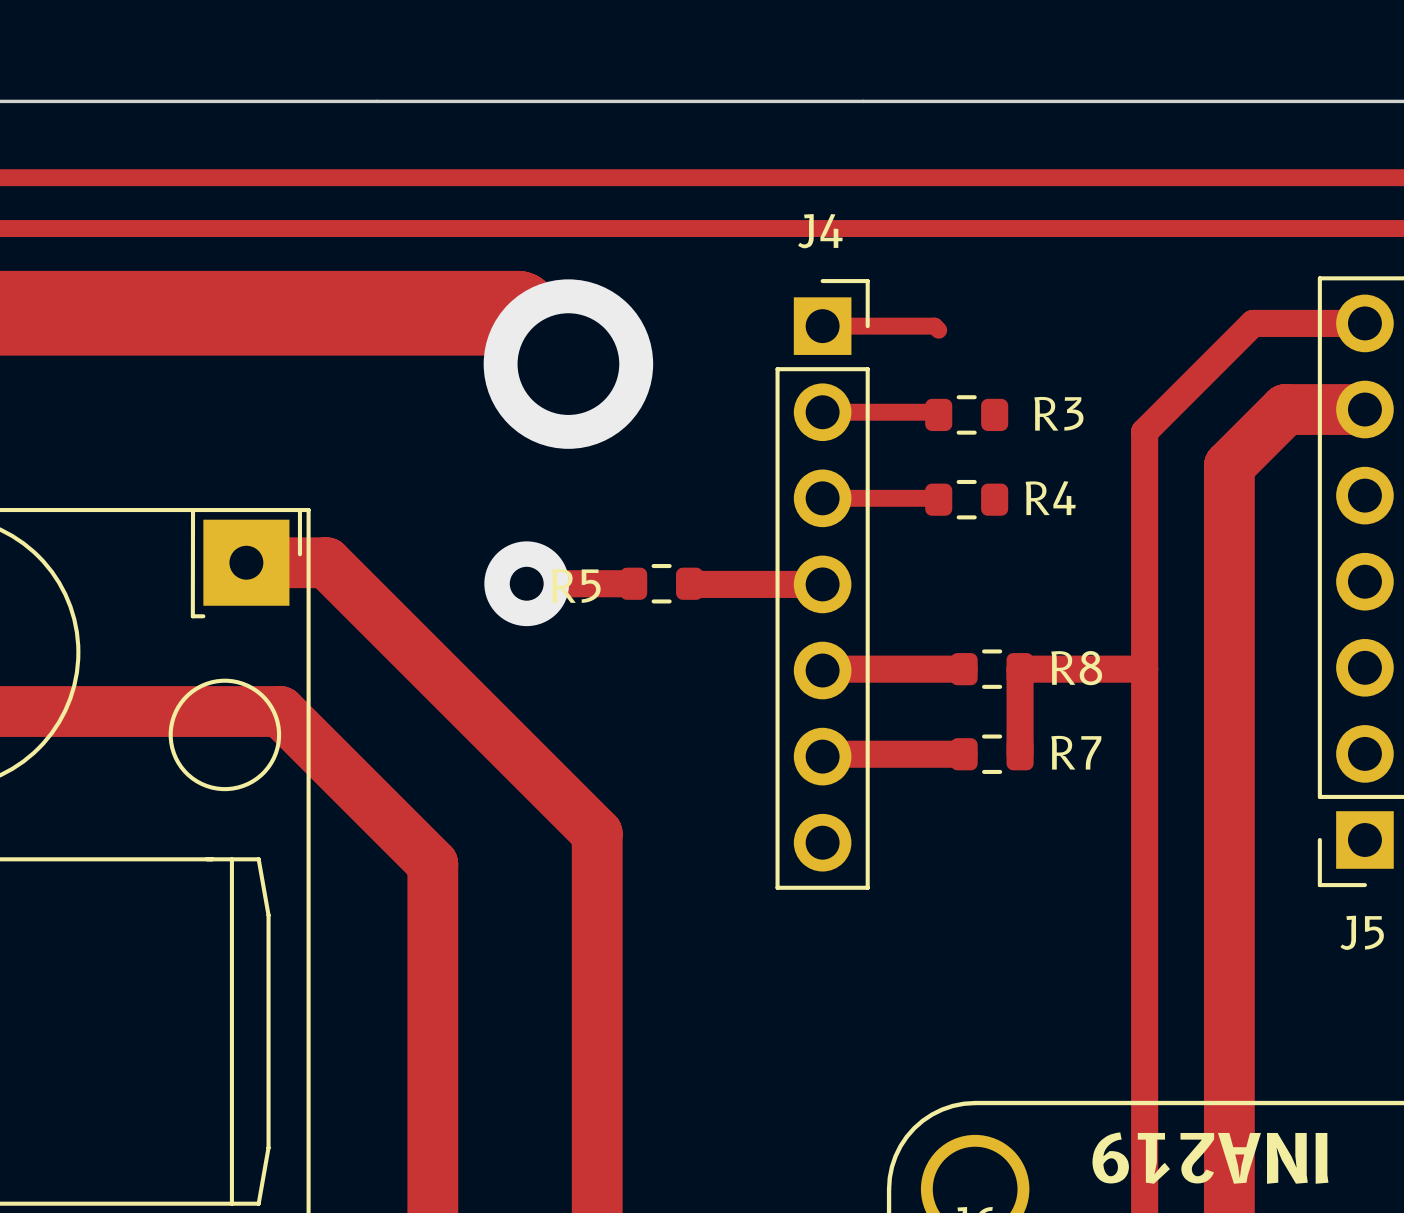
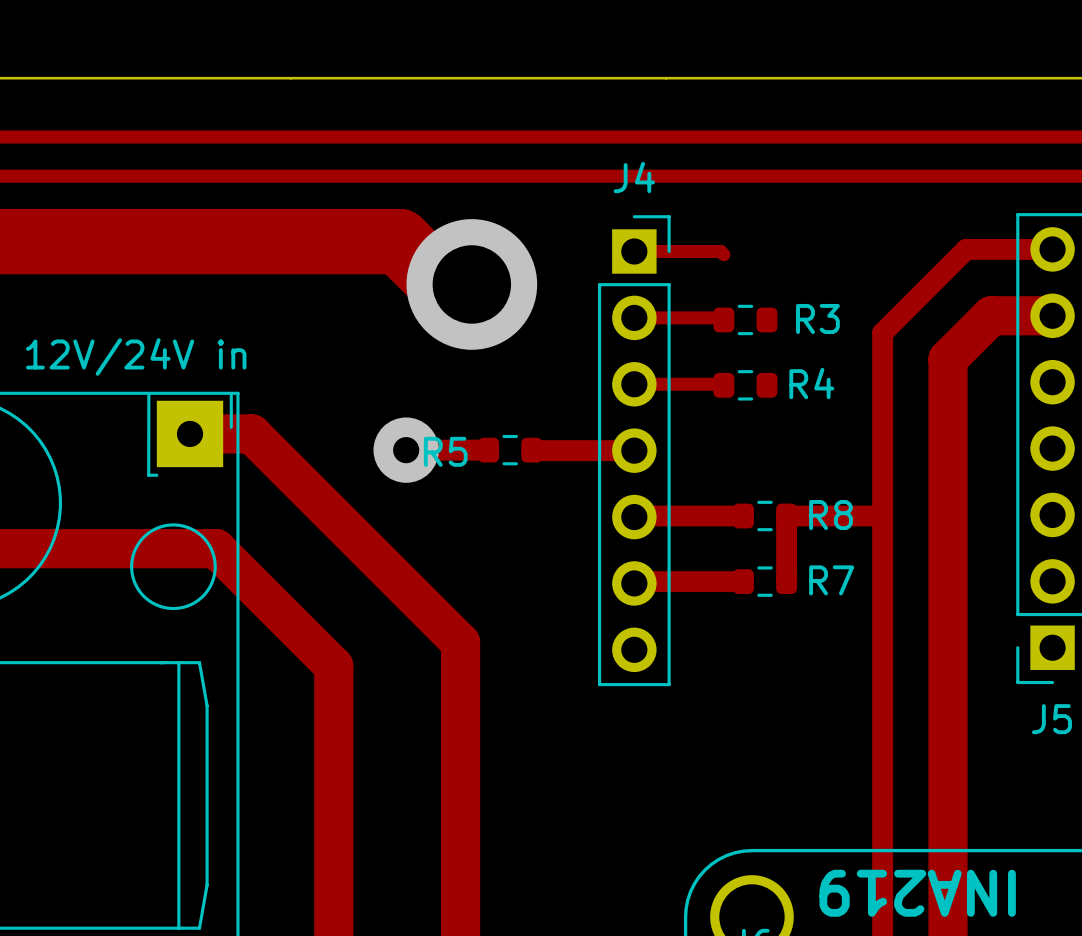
via position: (568, 364) -> (471, 284)
text: none -> 12V/24V in (136, 356)

